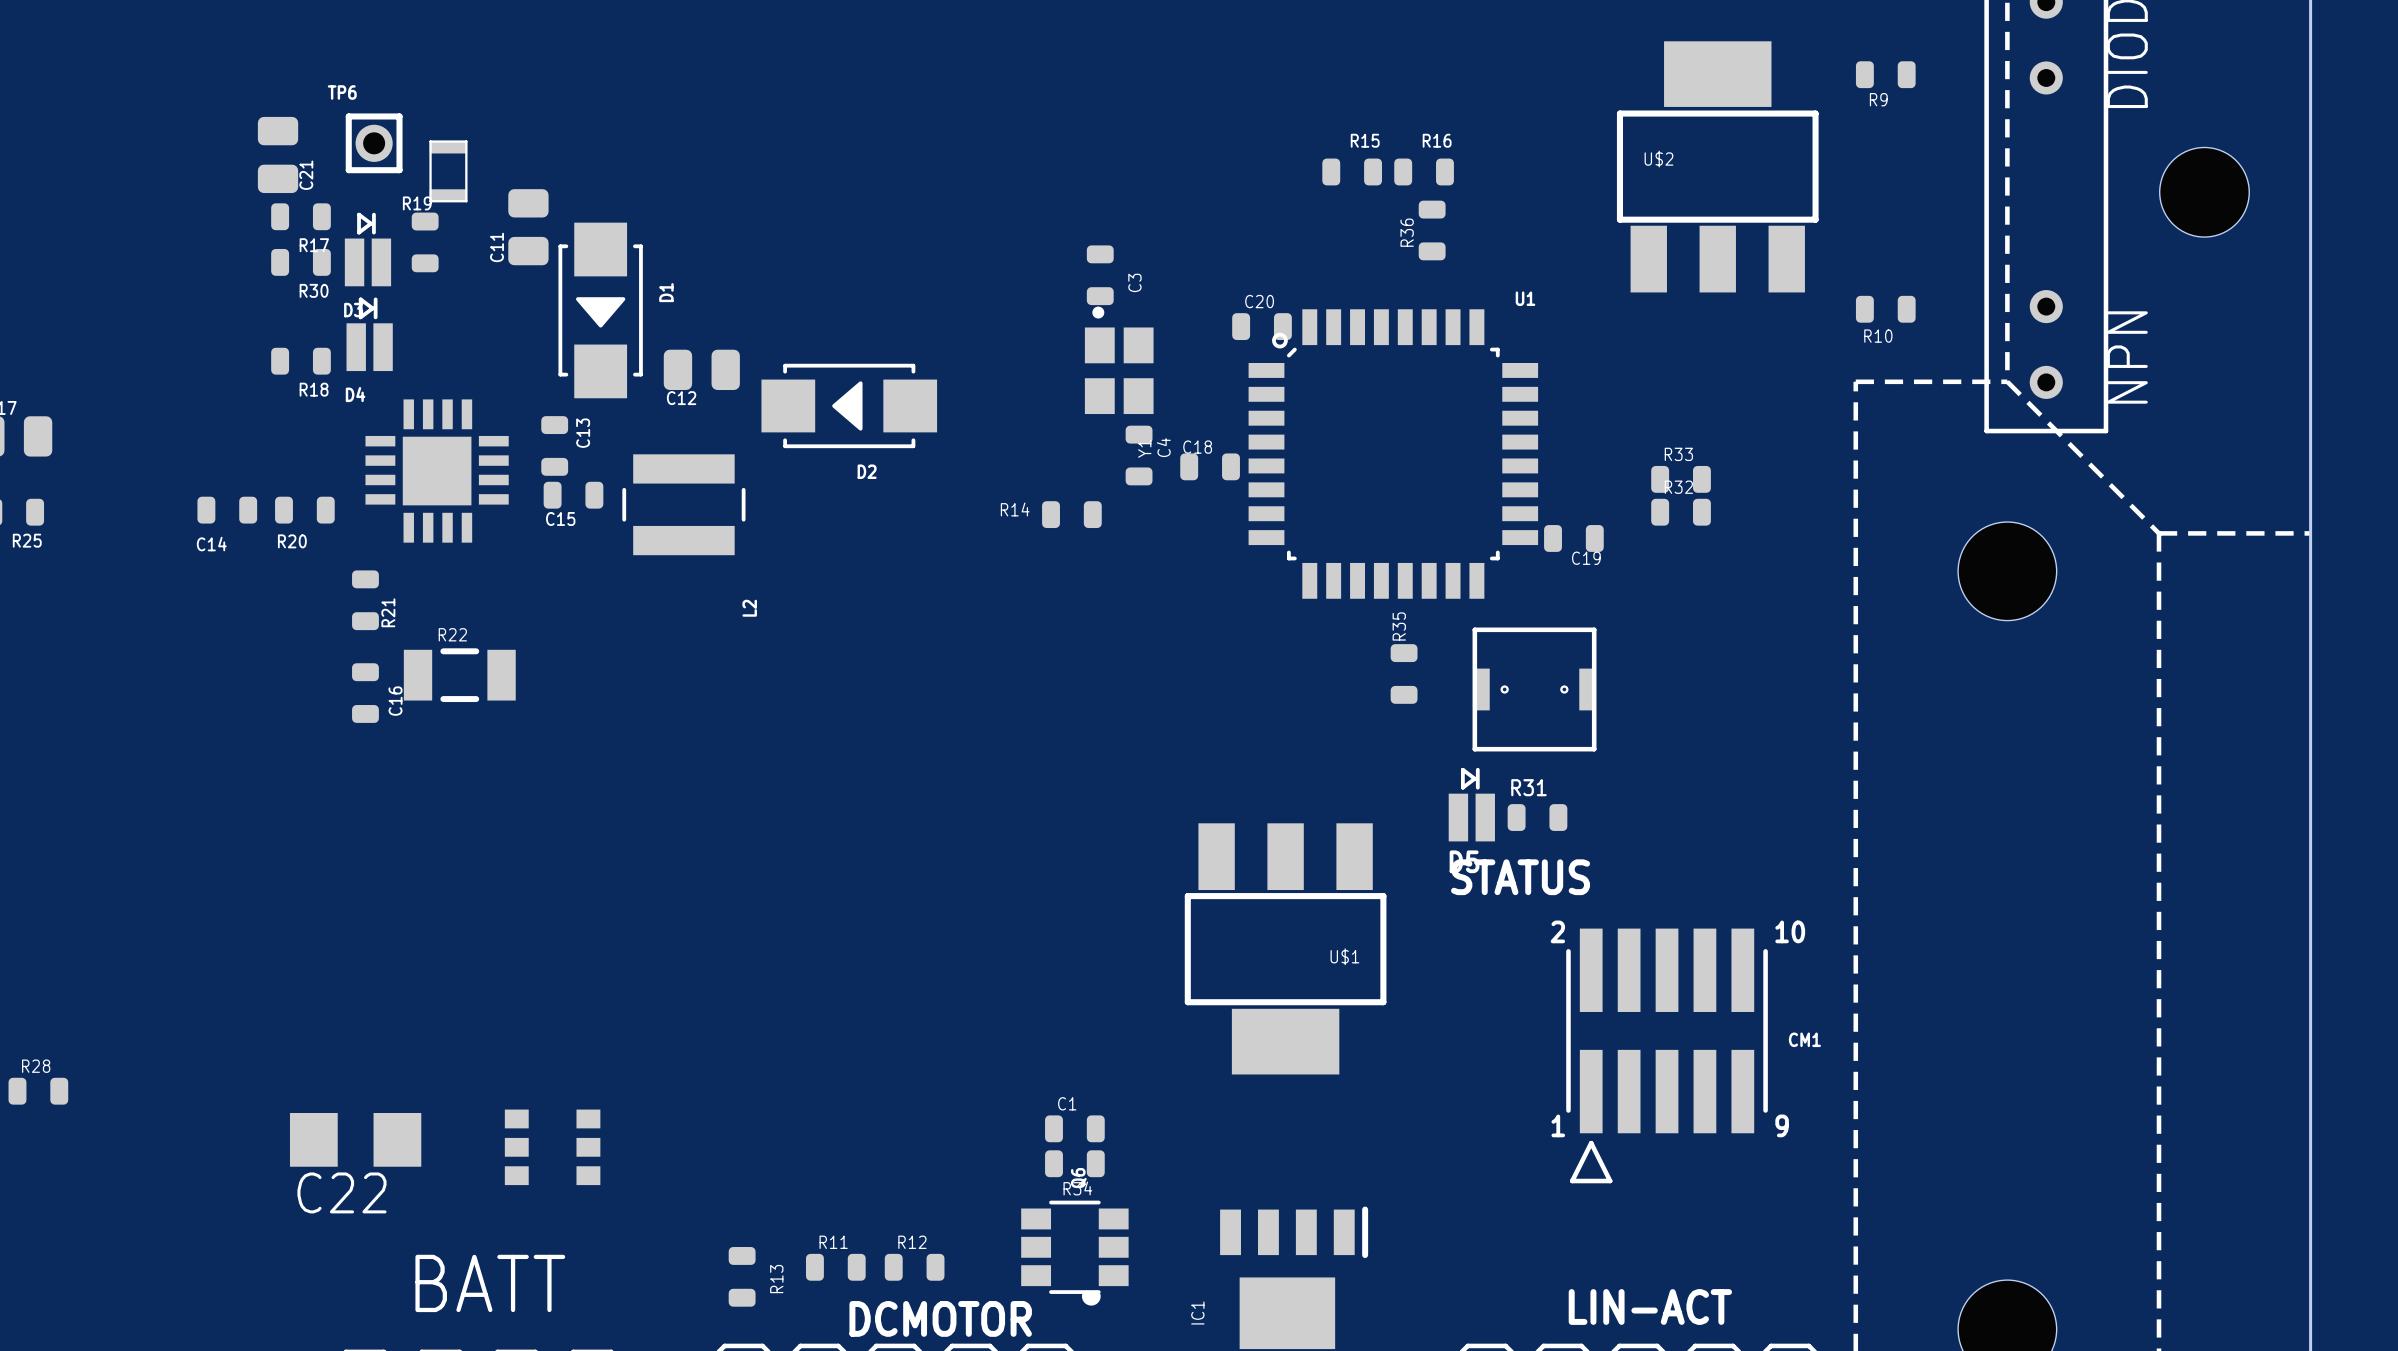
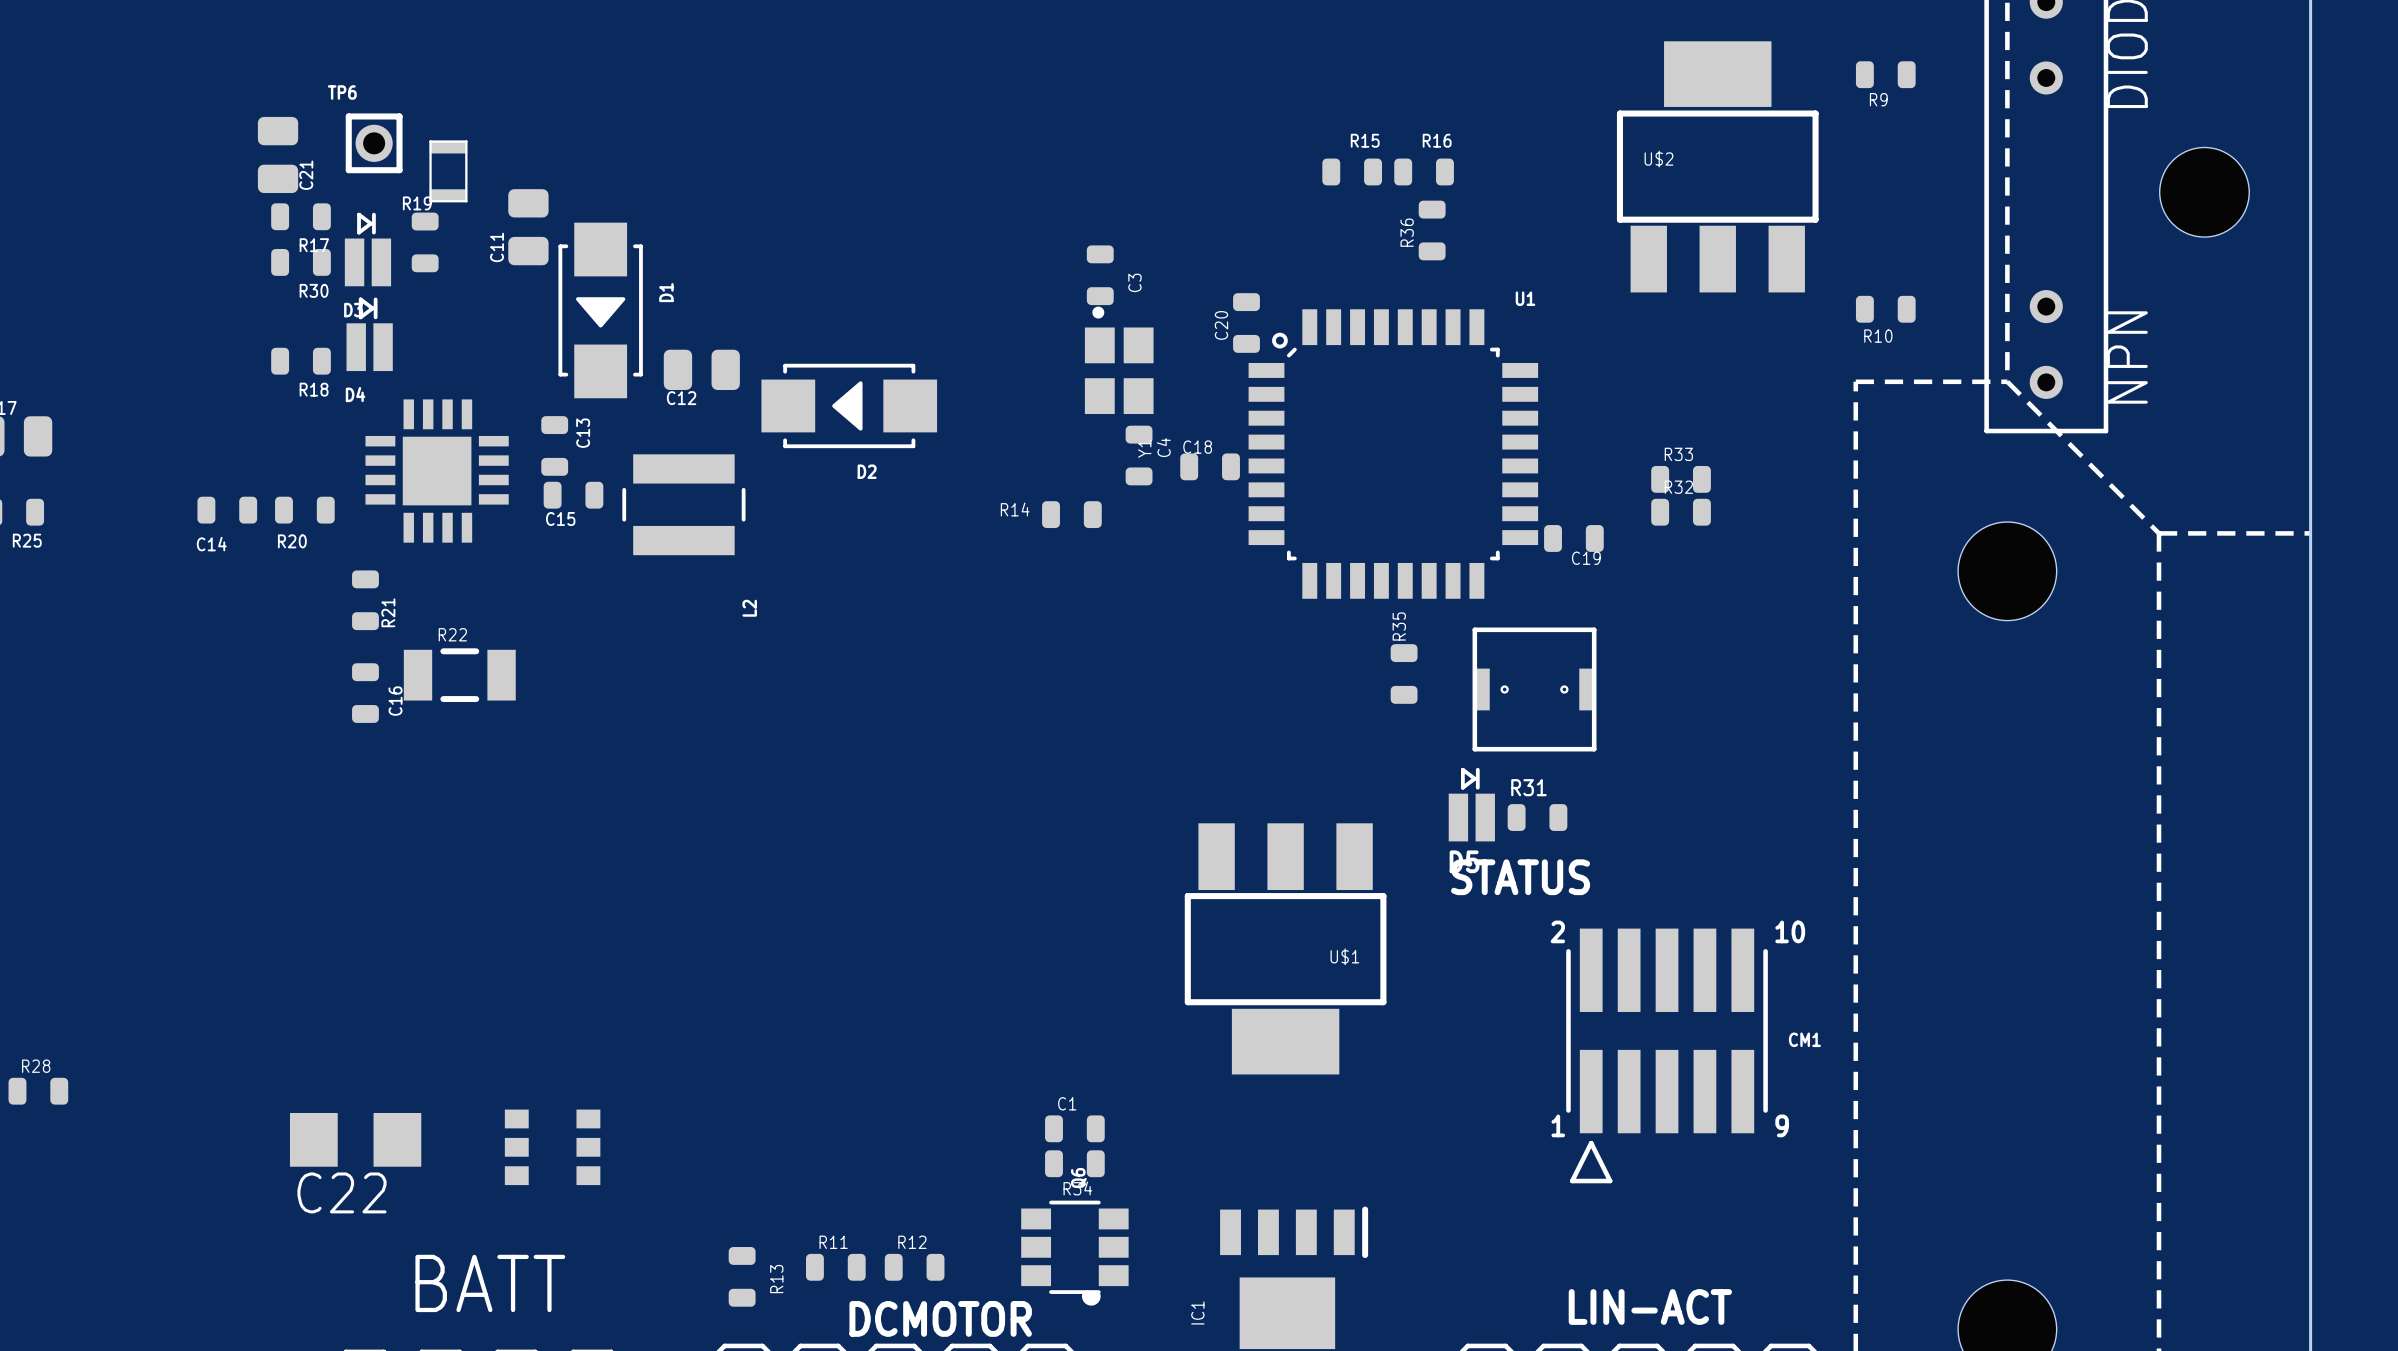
C20 rotation: 0° (1262, 326) -> 90° clockwise (1246, 323)

